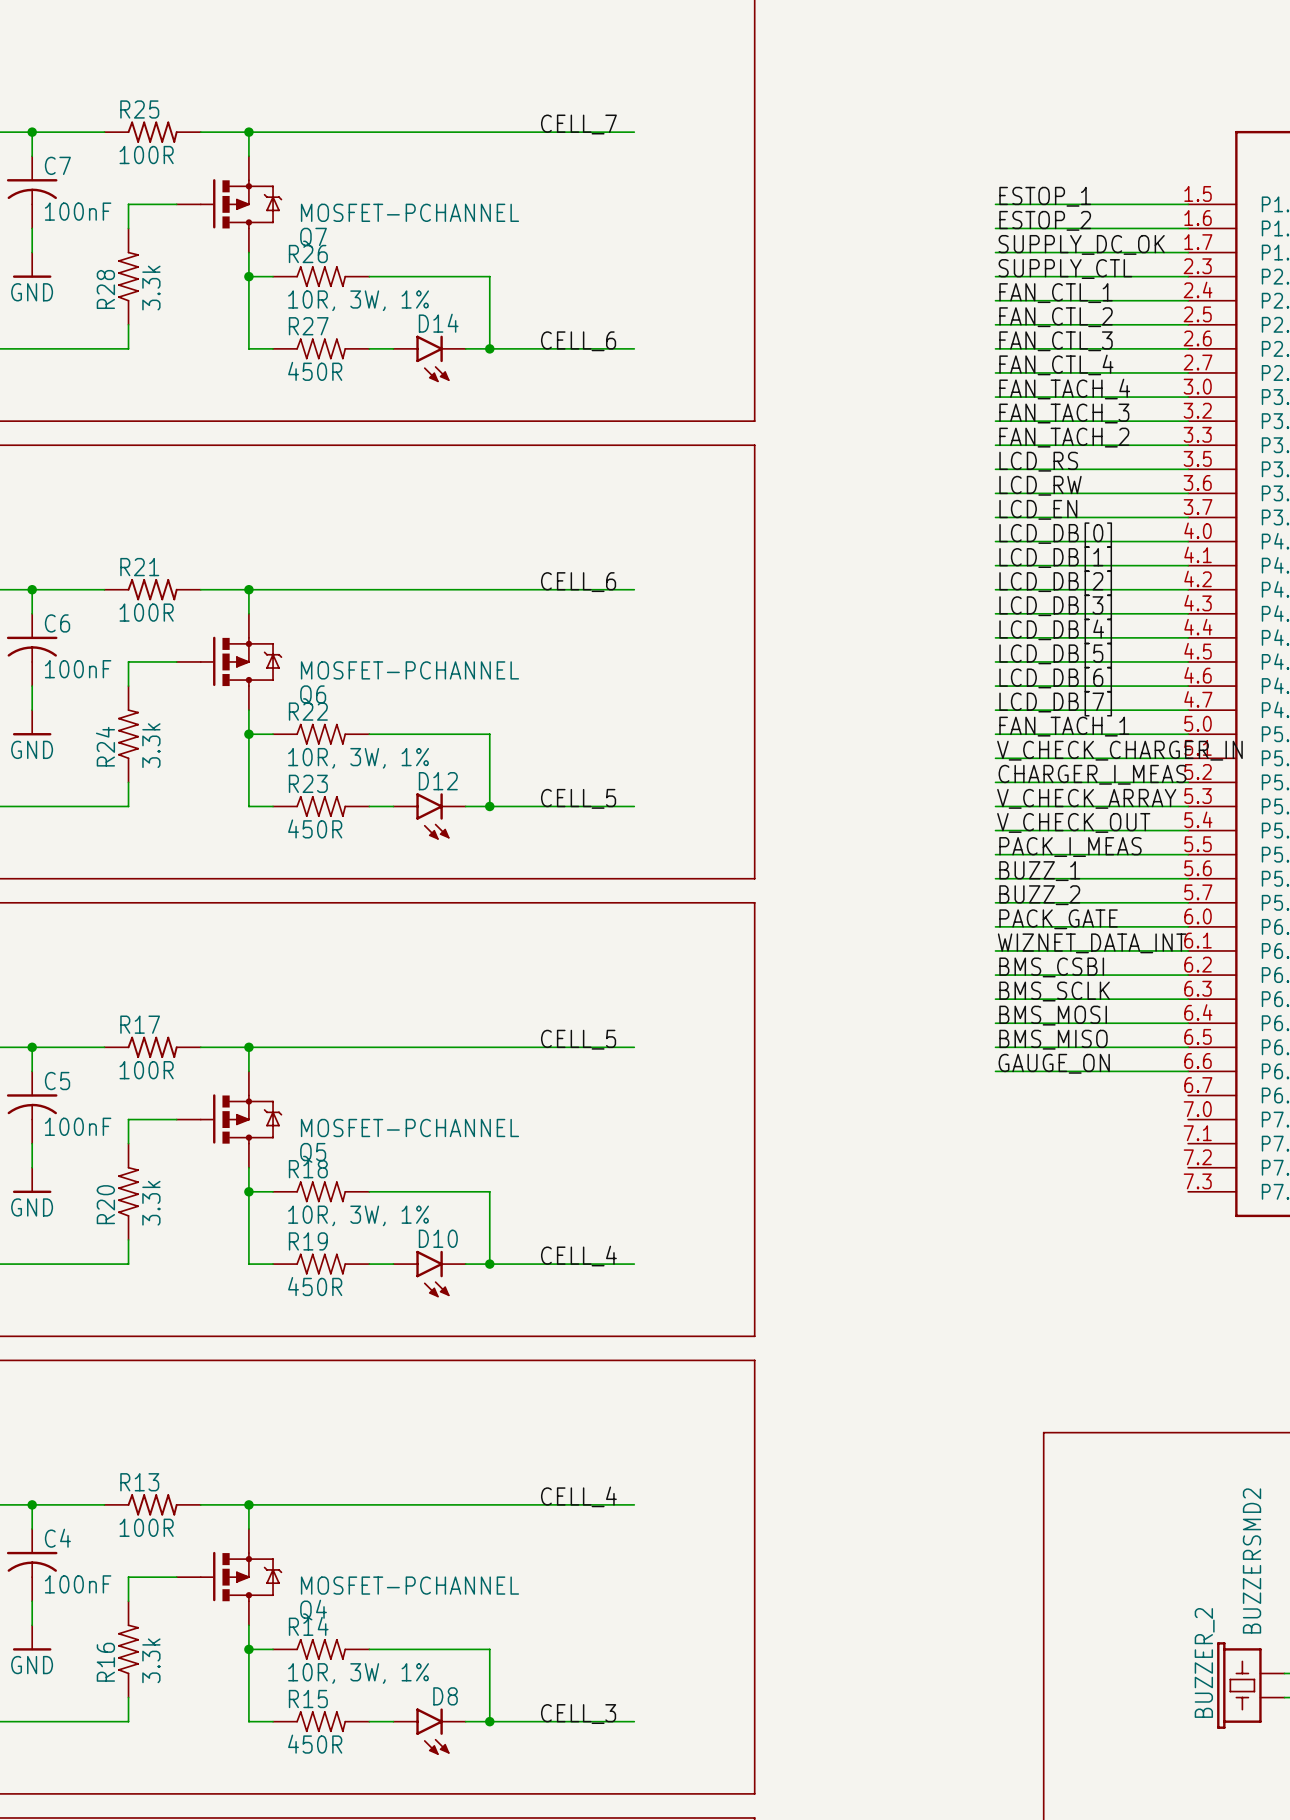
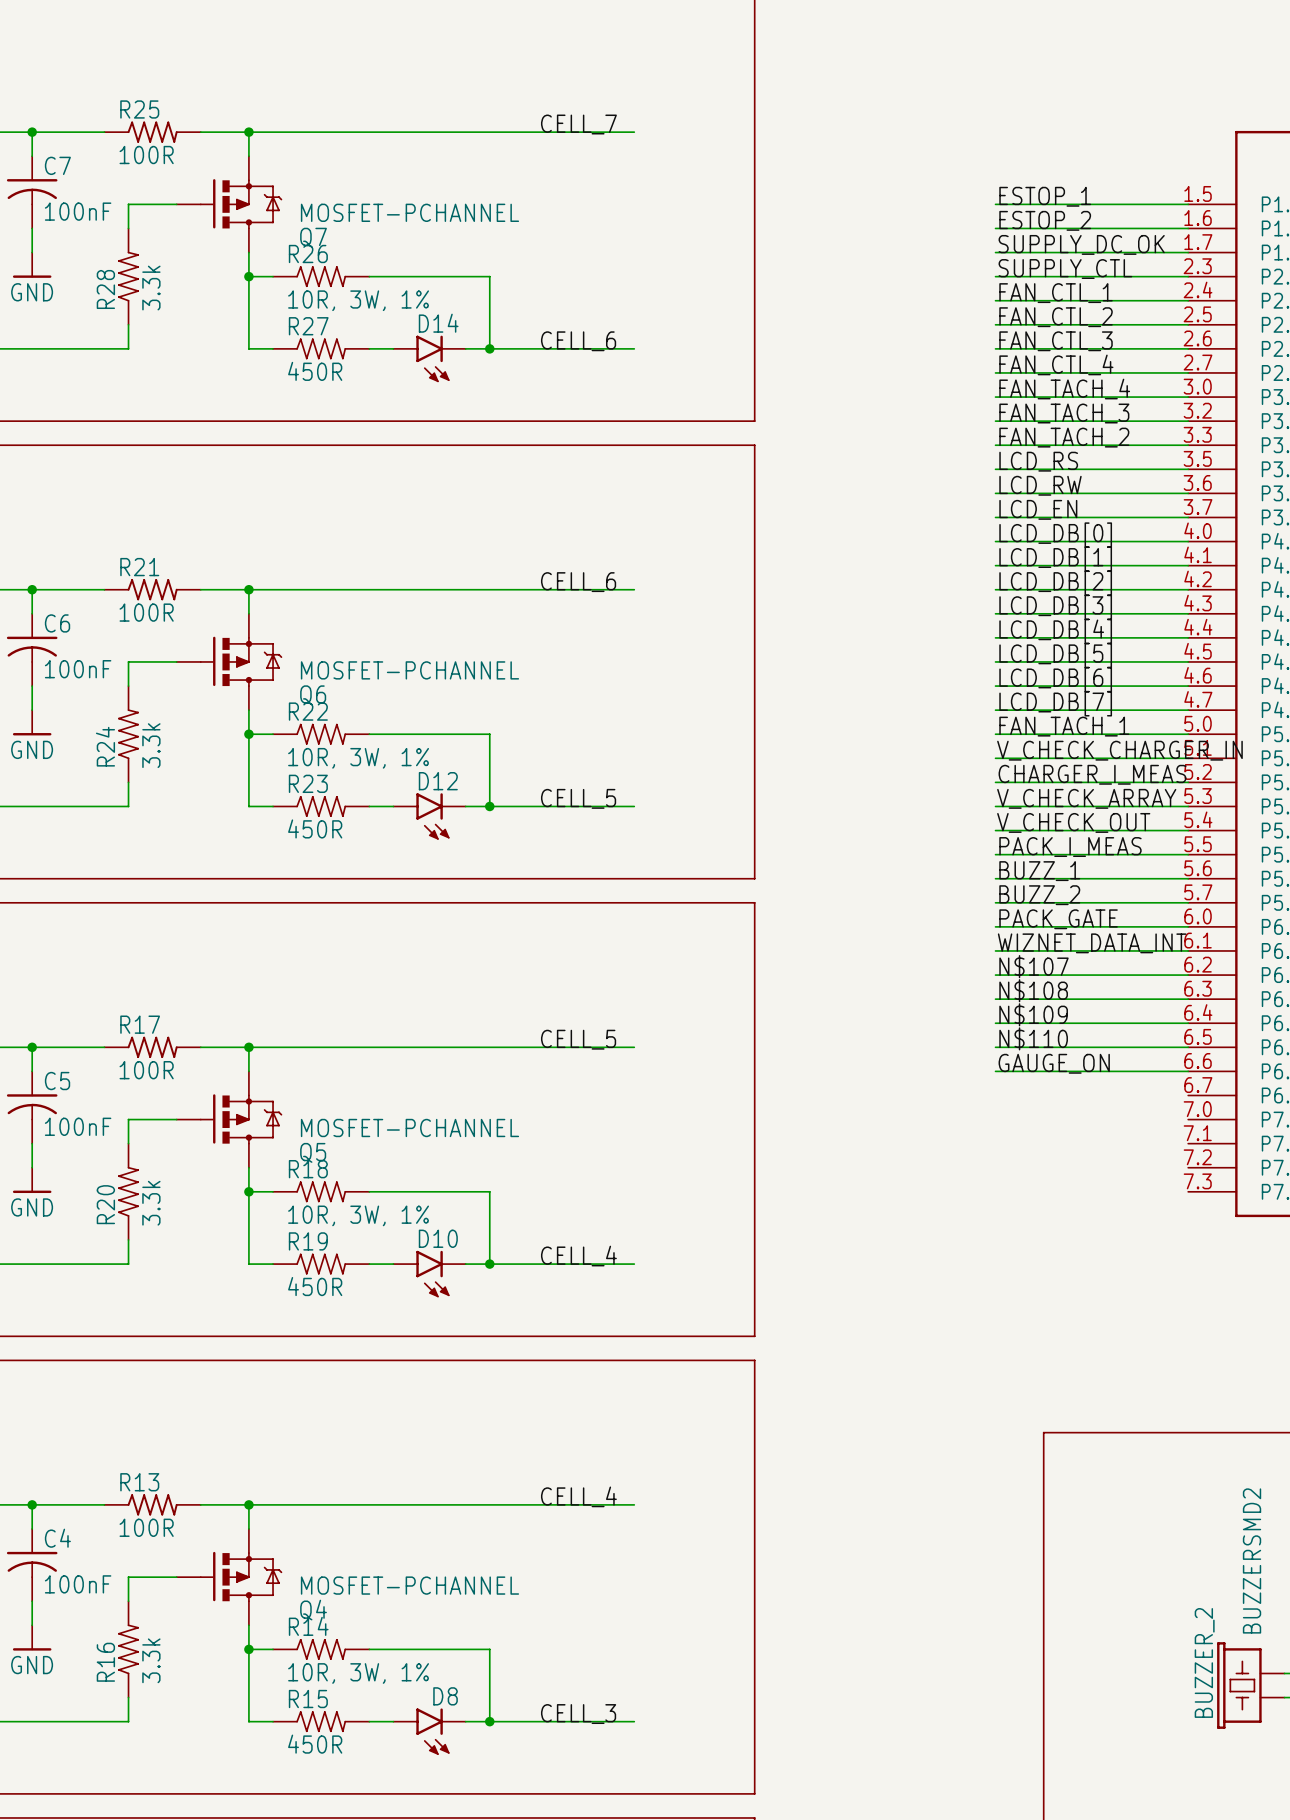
label: BMS_CSBI (1051, 967) -> N$107 (1033, 966)
label: BMS_SCLK (1054, 991) -> N$108 (1033, 990)
label: BMS_MOSI (1053, 1015) -> N$109 (1033, 1014)
label: BMS_MISO (1053, 1039) -> N$110 (1033, 1038)

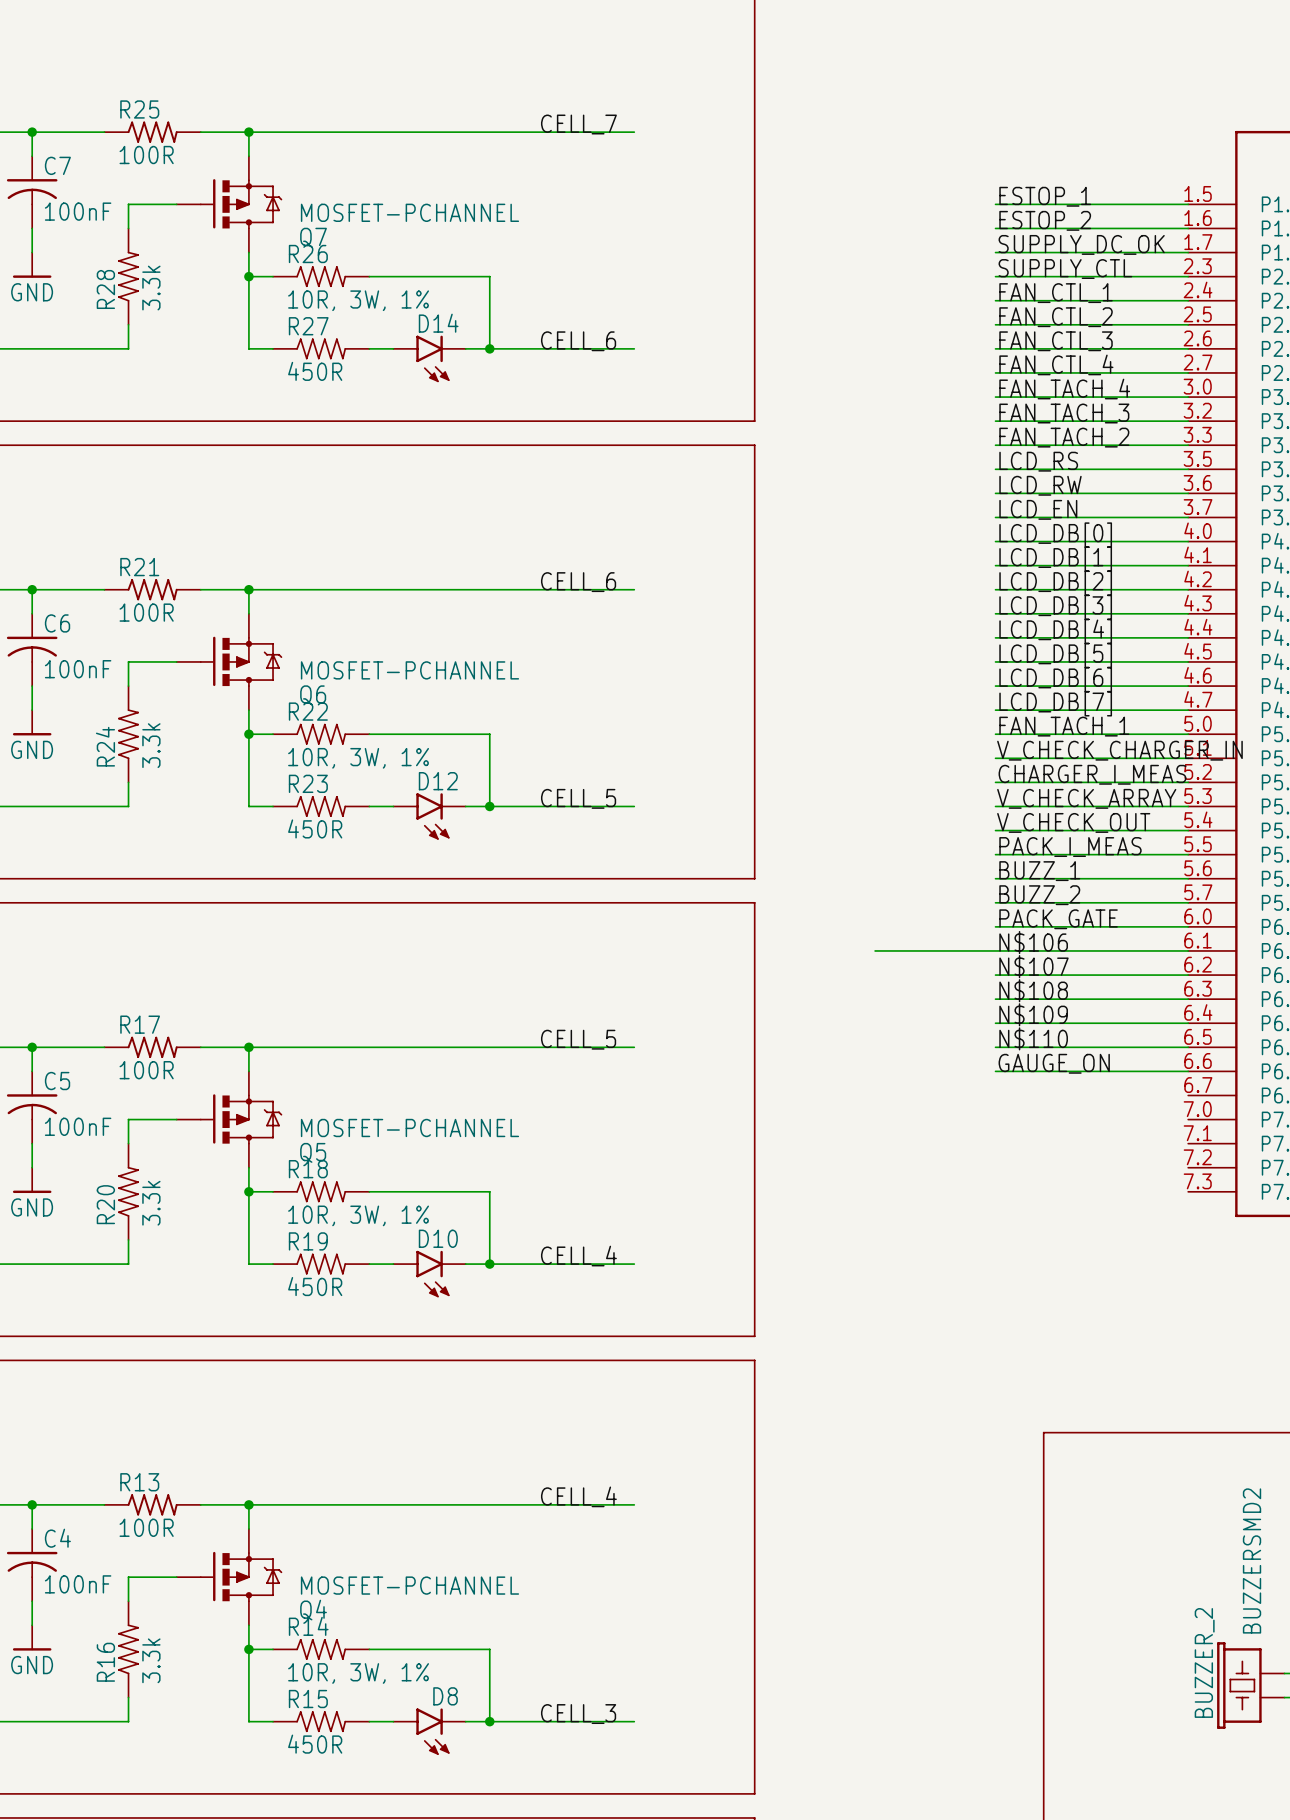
label: WIZNET_DATA_INT (1092, 943) -> N$106 (1033, 942)
wire: none -> (875, 950) (995, 950)

